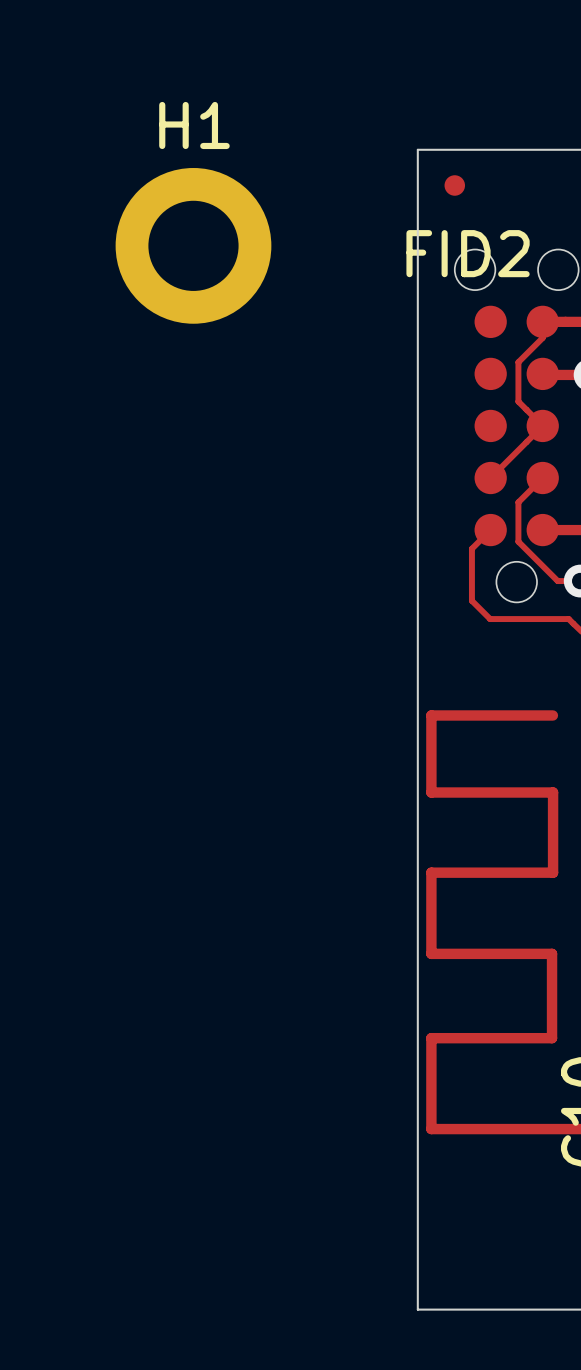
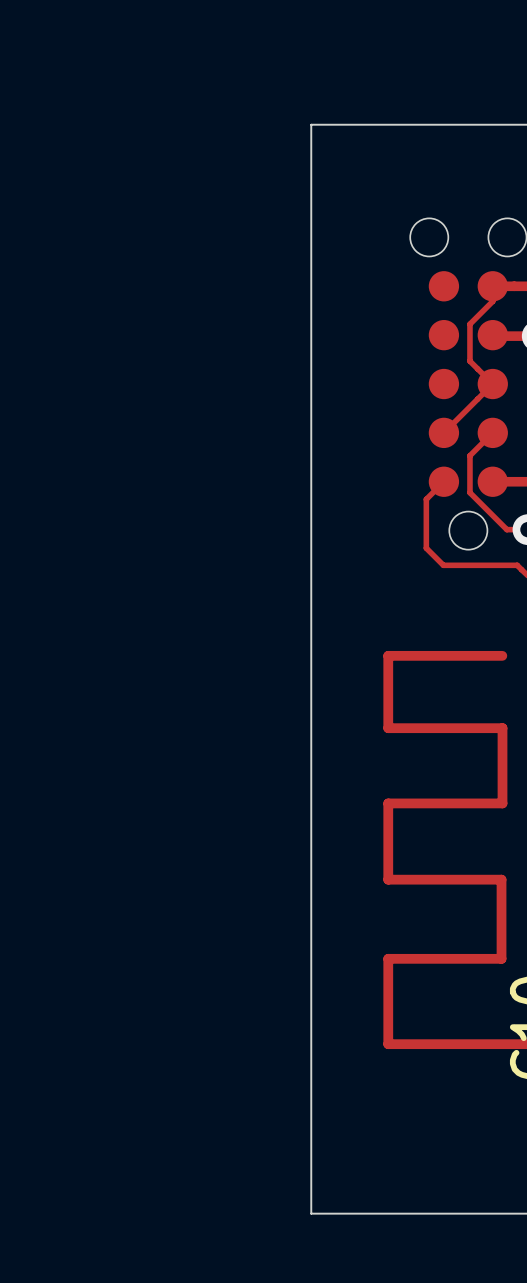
board edge: (417, 149) (417, 1309) -> (375, 124) (311, 124) (311, 1213) (375, 1213)
FID2: (454, 185) -> none
H1: (193, 245) -> none

